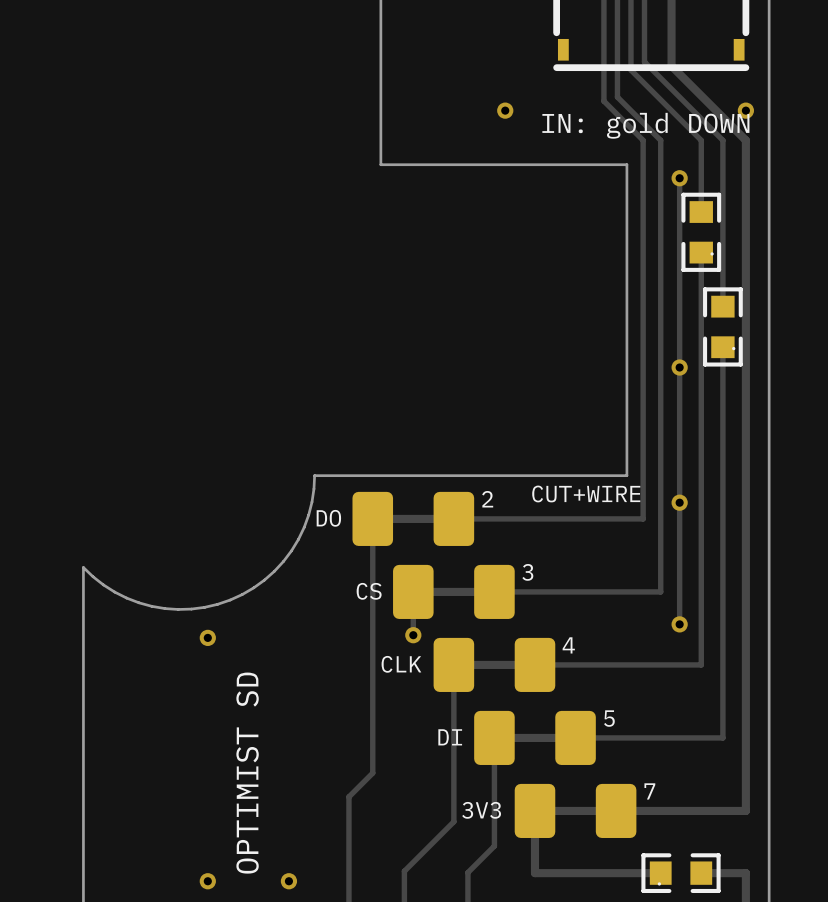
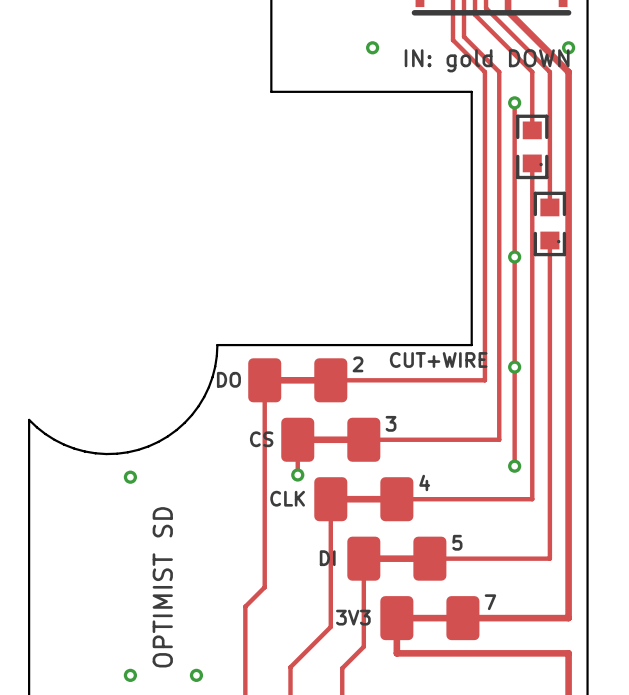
track: (534, 854) (534, 873) (660, 873) -> (396, 653) (568, 653) (568, 668)
part: (681, 873) -> none
track: (701, 873) (745, 873) -> none

